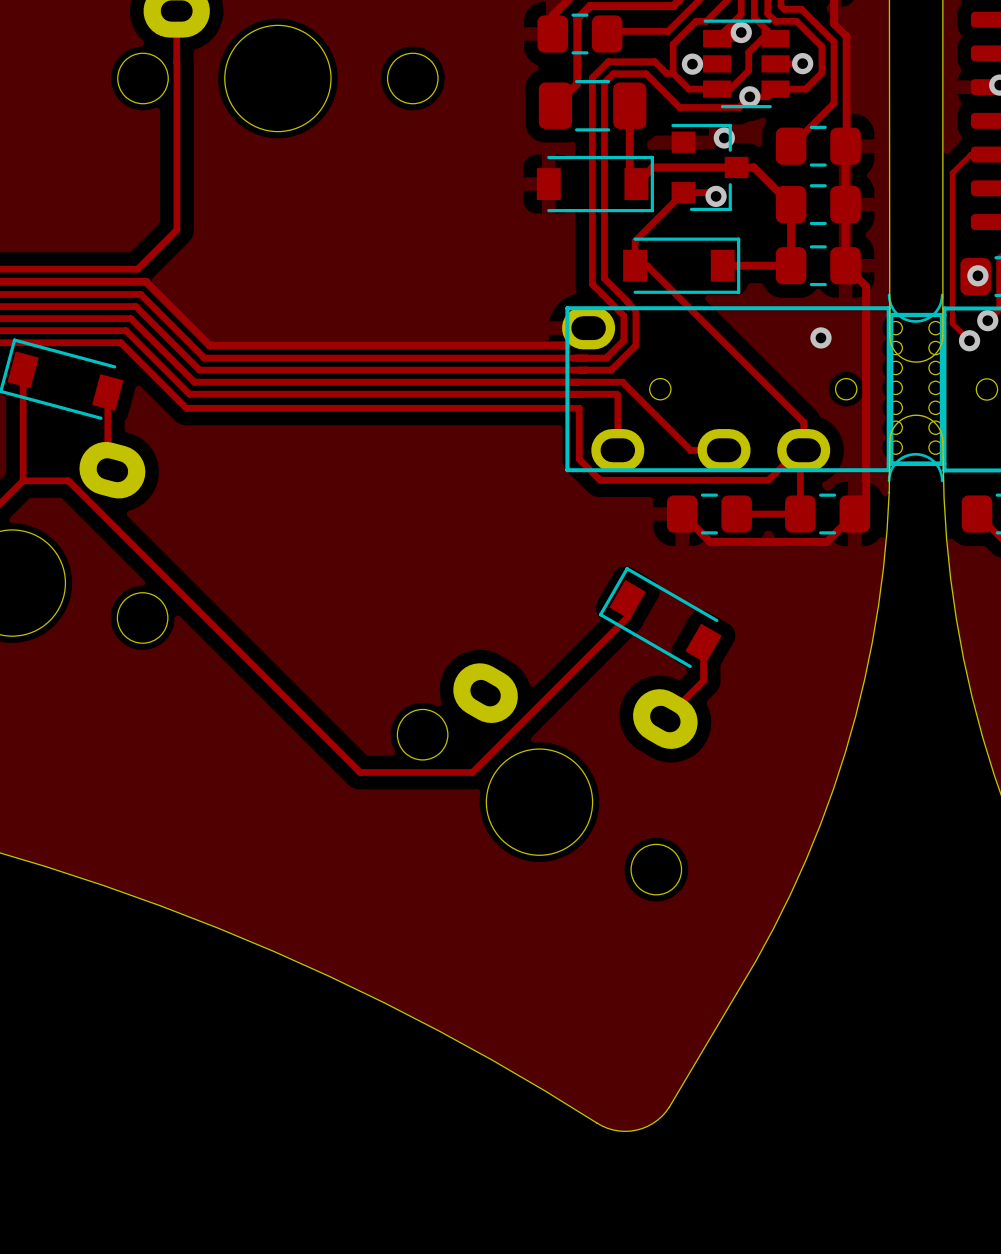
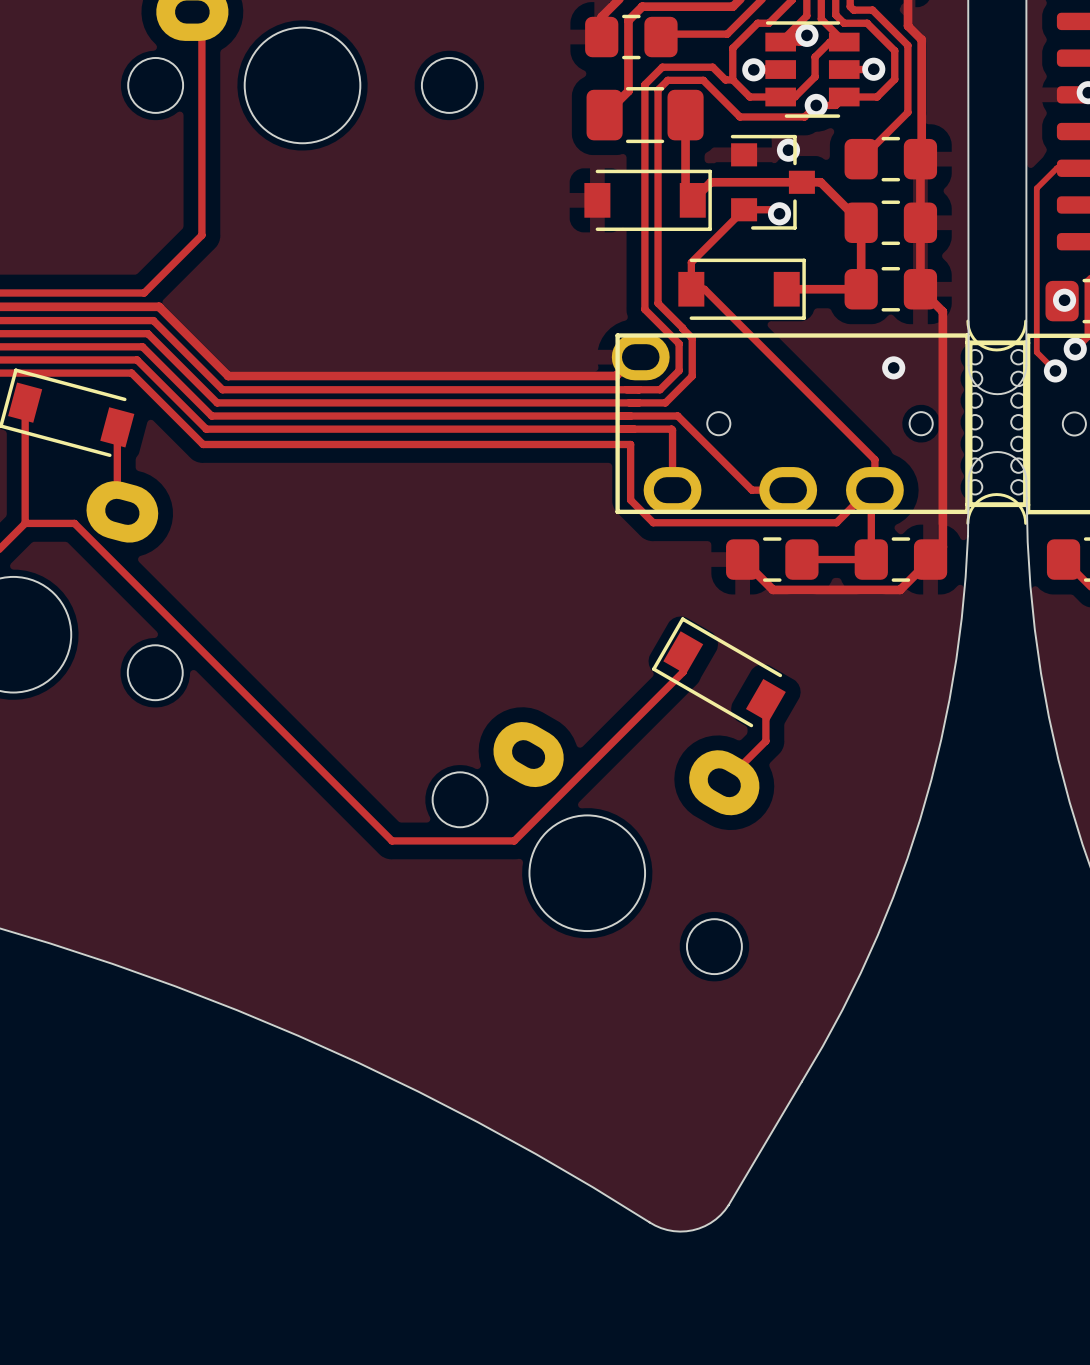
track: (176, 11) (176, 62) -> none
track: (176, 62) (176, 229) (137, 269) (132, 269) -> (192, 12) (201, 21) (201, 235) (144, 293)

